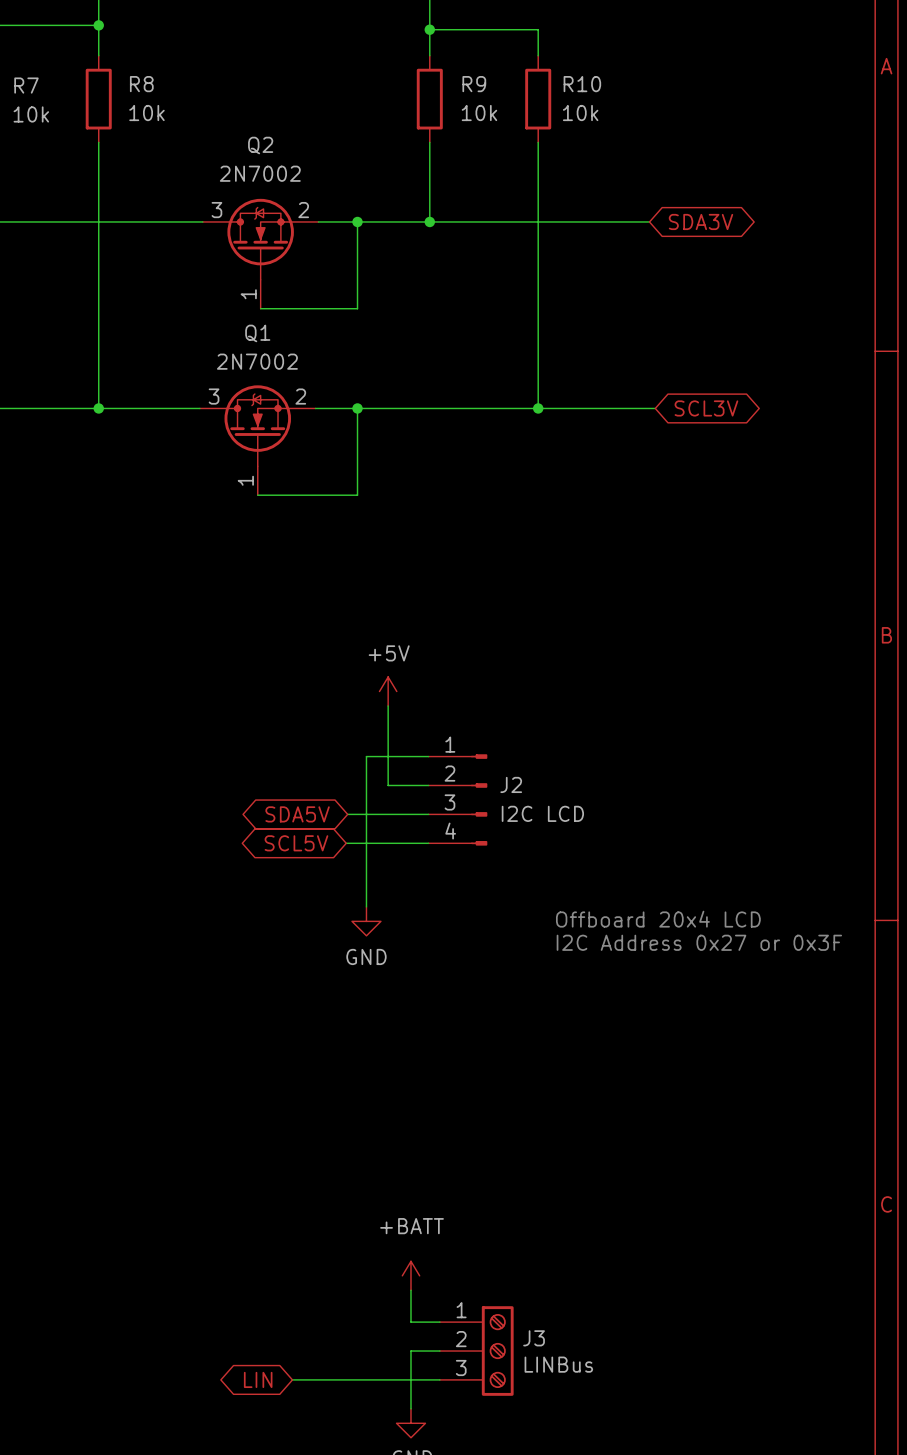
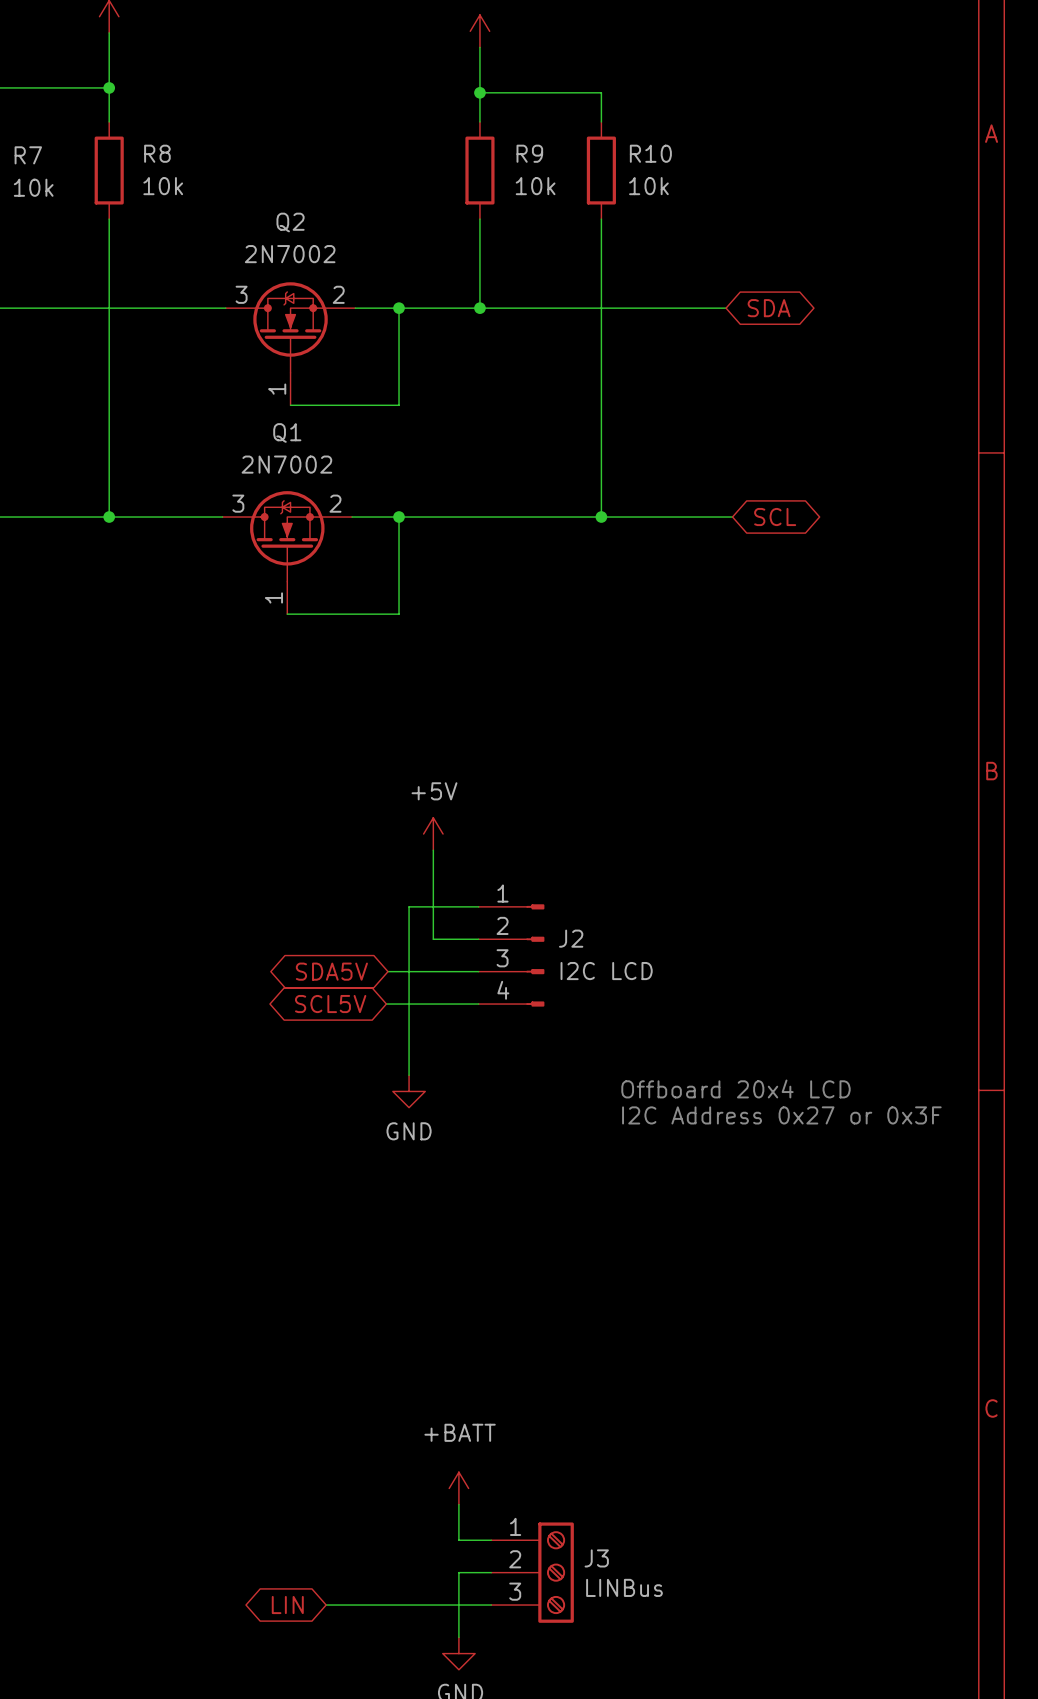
global label: SDA3V (701, 221) -> SDA (769, 308)
global label: SCL3V (706, 408) -> SCL (775, 517)

